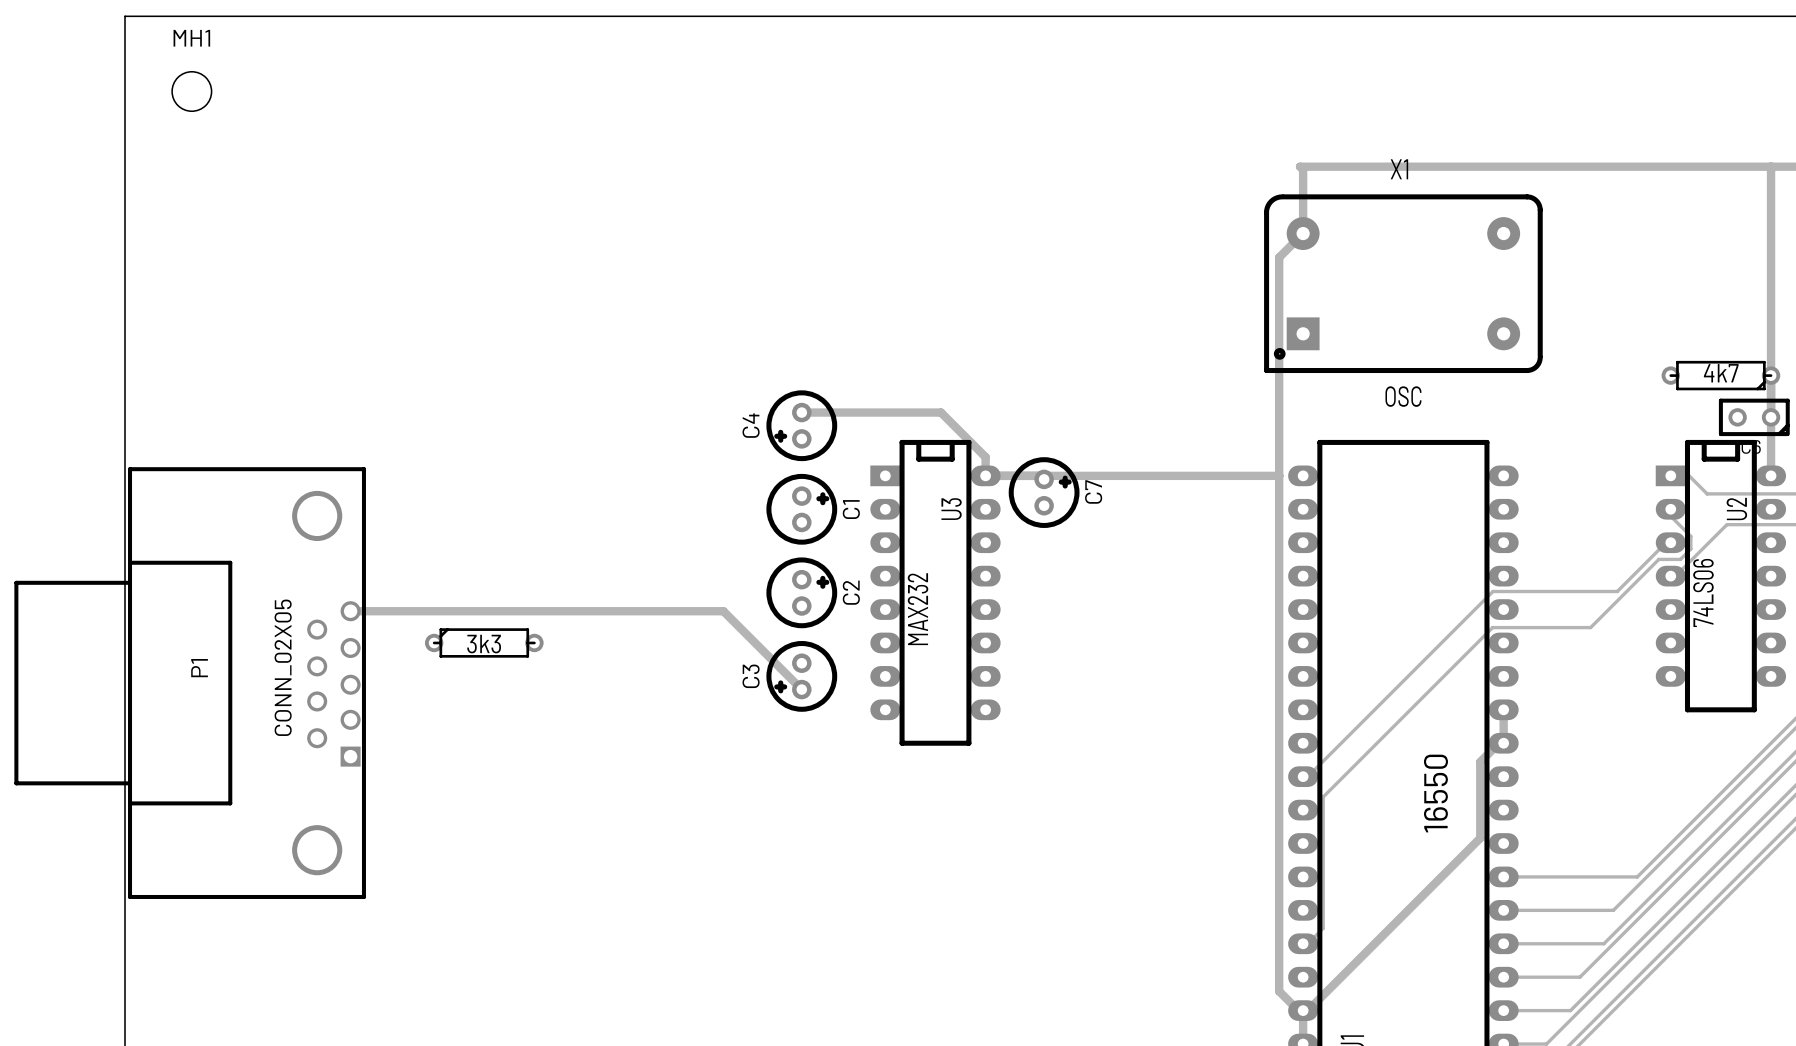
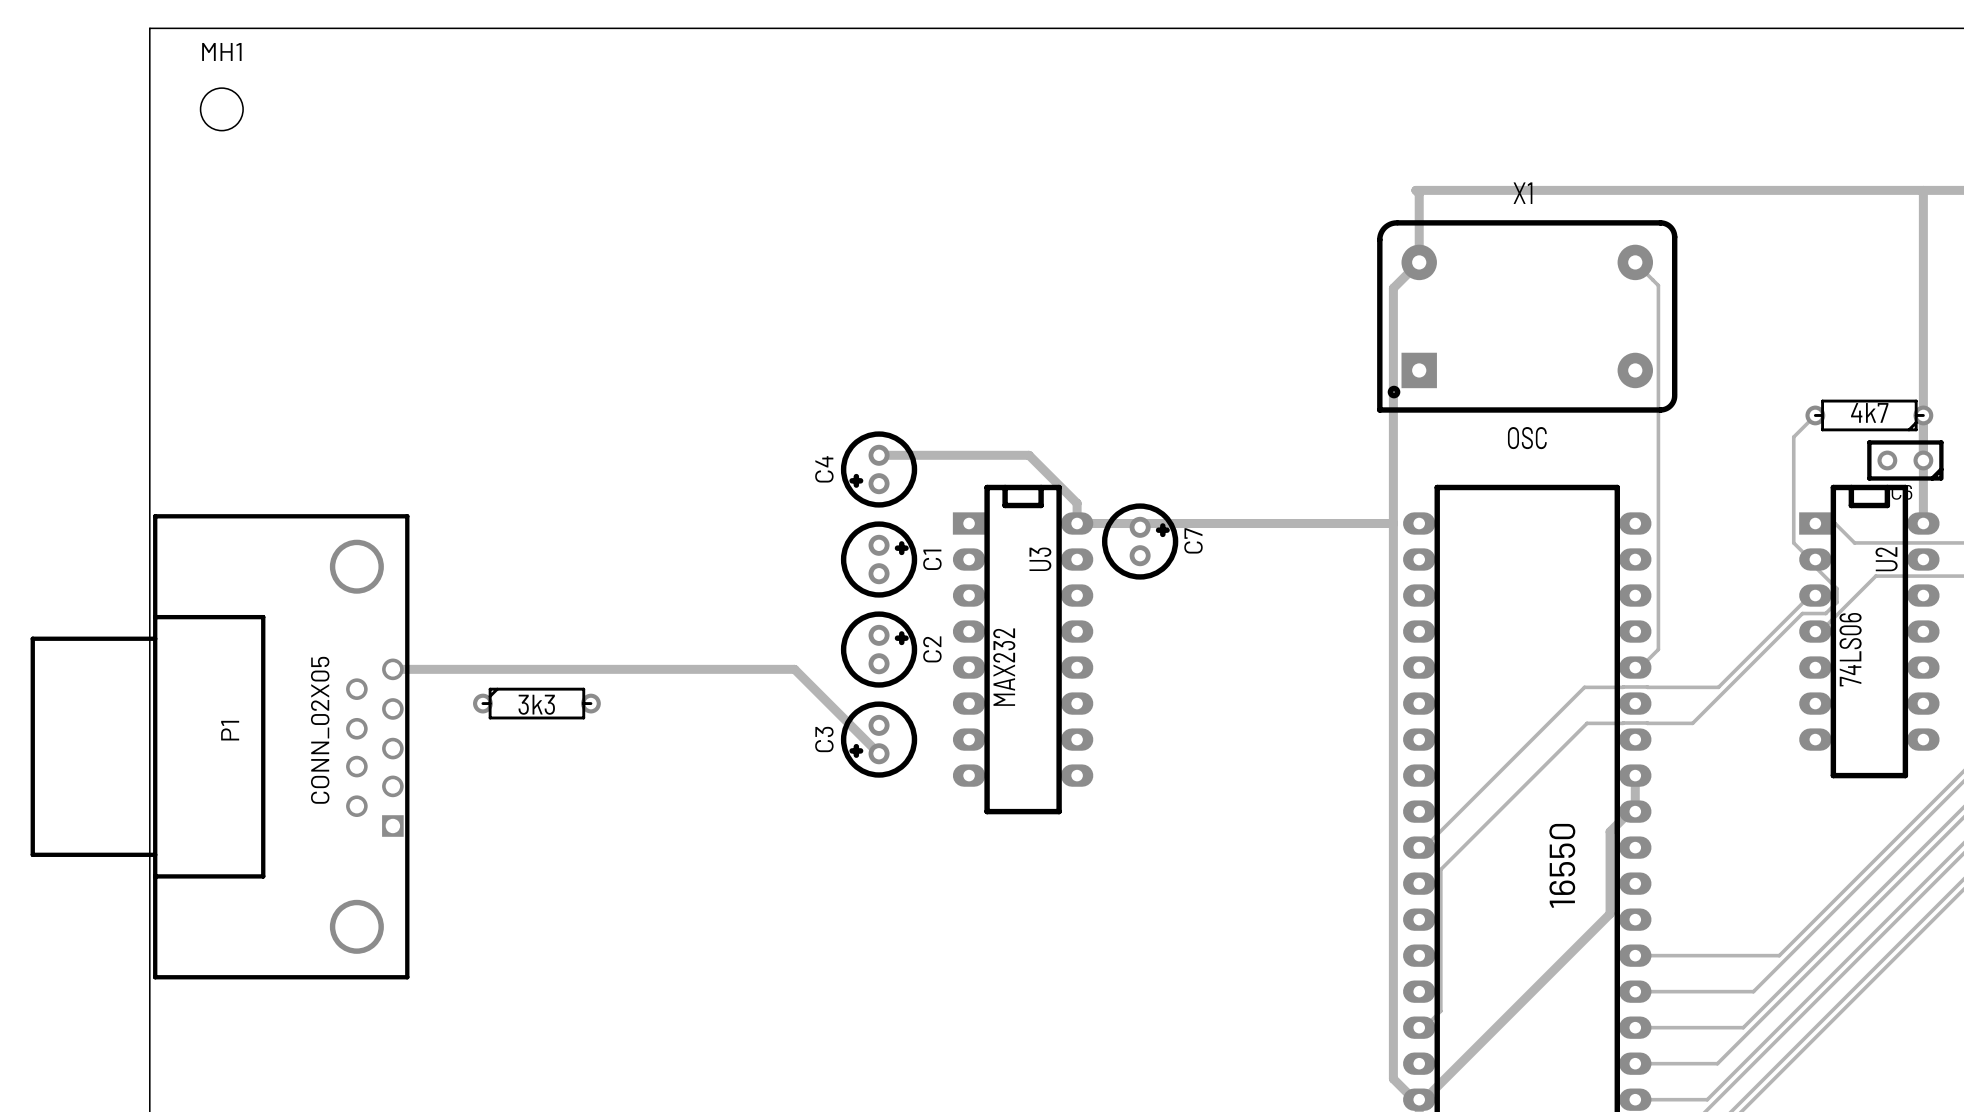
track: none -> (1635, 262) (1658, 285) (1658, 649) (1640, 667) (1635, 667)
track: none -> (1815, 415) (1793, 437) (1793, 542) (1810, 559) (1815, 559)
track: (1617, 591) (1492, 591) (1456, 627) -> none
track: (1492, 627) (1458, 661) -> (1623, 687) (1584, 687)
track: (1514, 627) (1590, 627) -> (1647, 687) (1718, 687) (1757, 648)
track: none -> (1729, 687) (1692, 723) (1587, 723)

